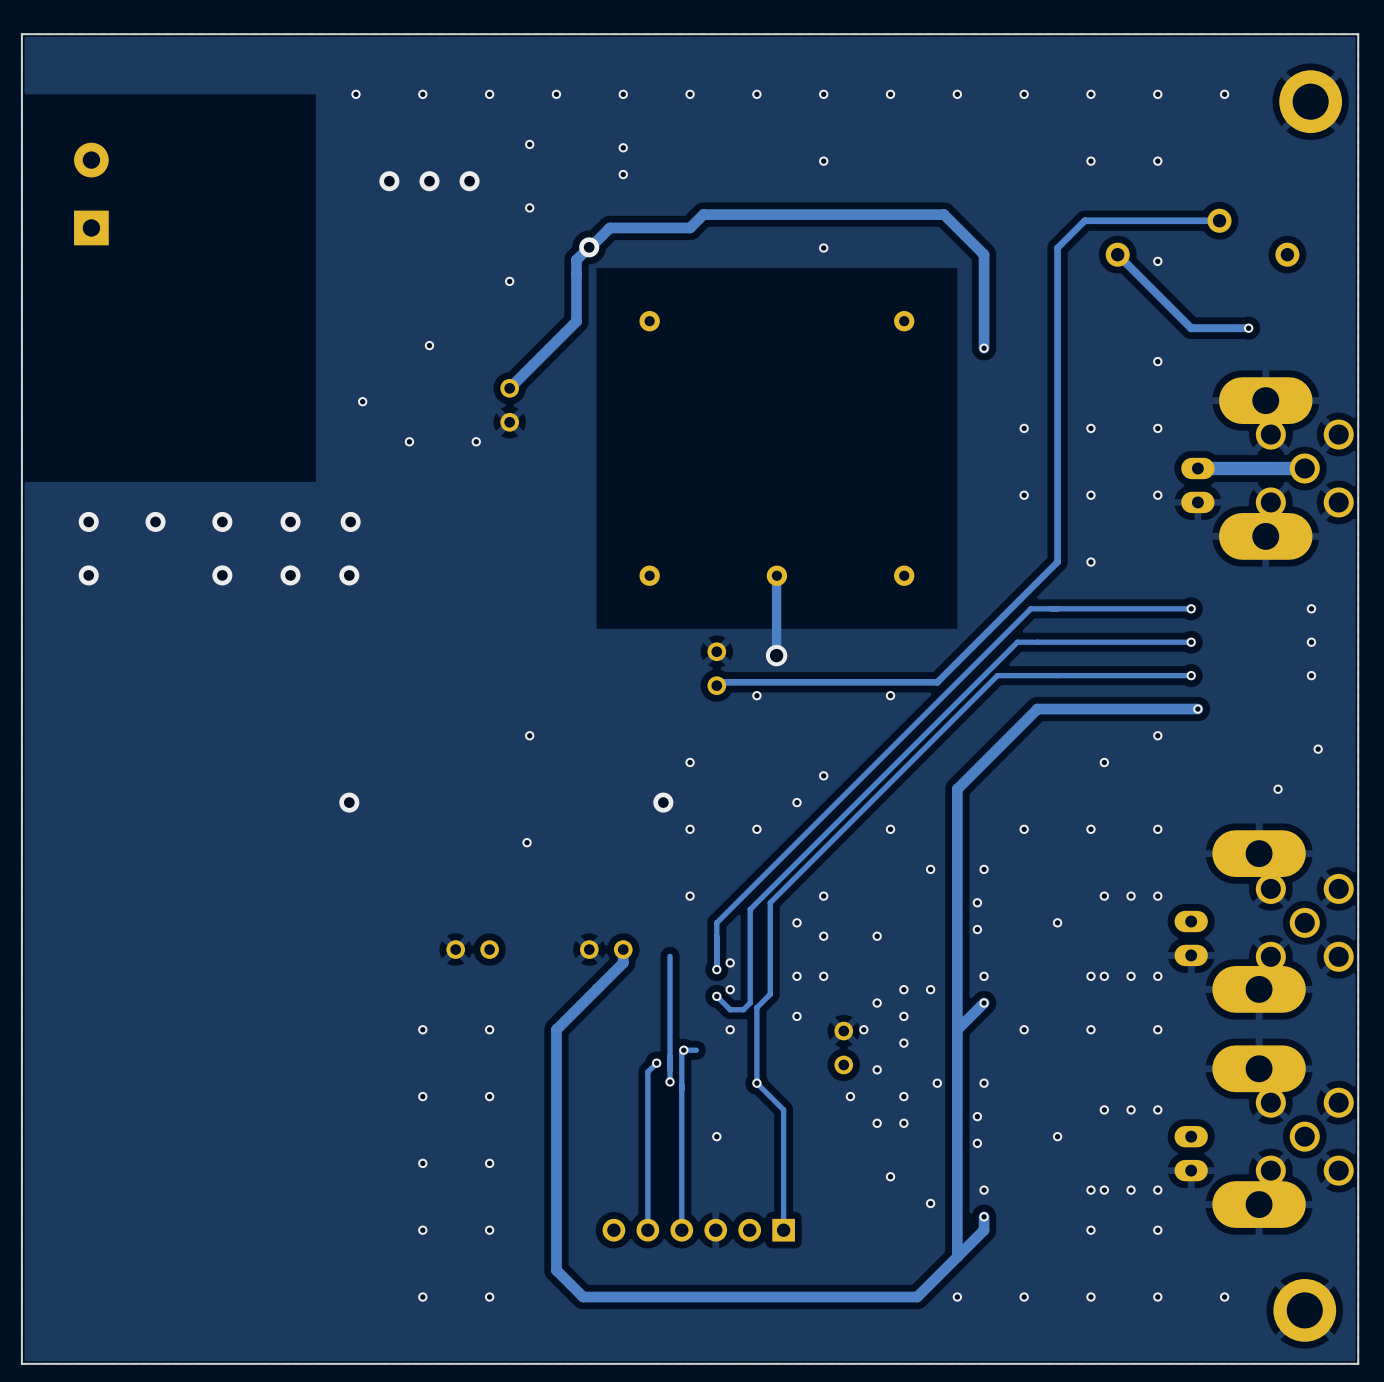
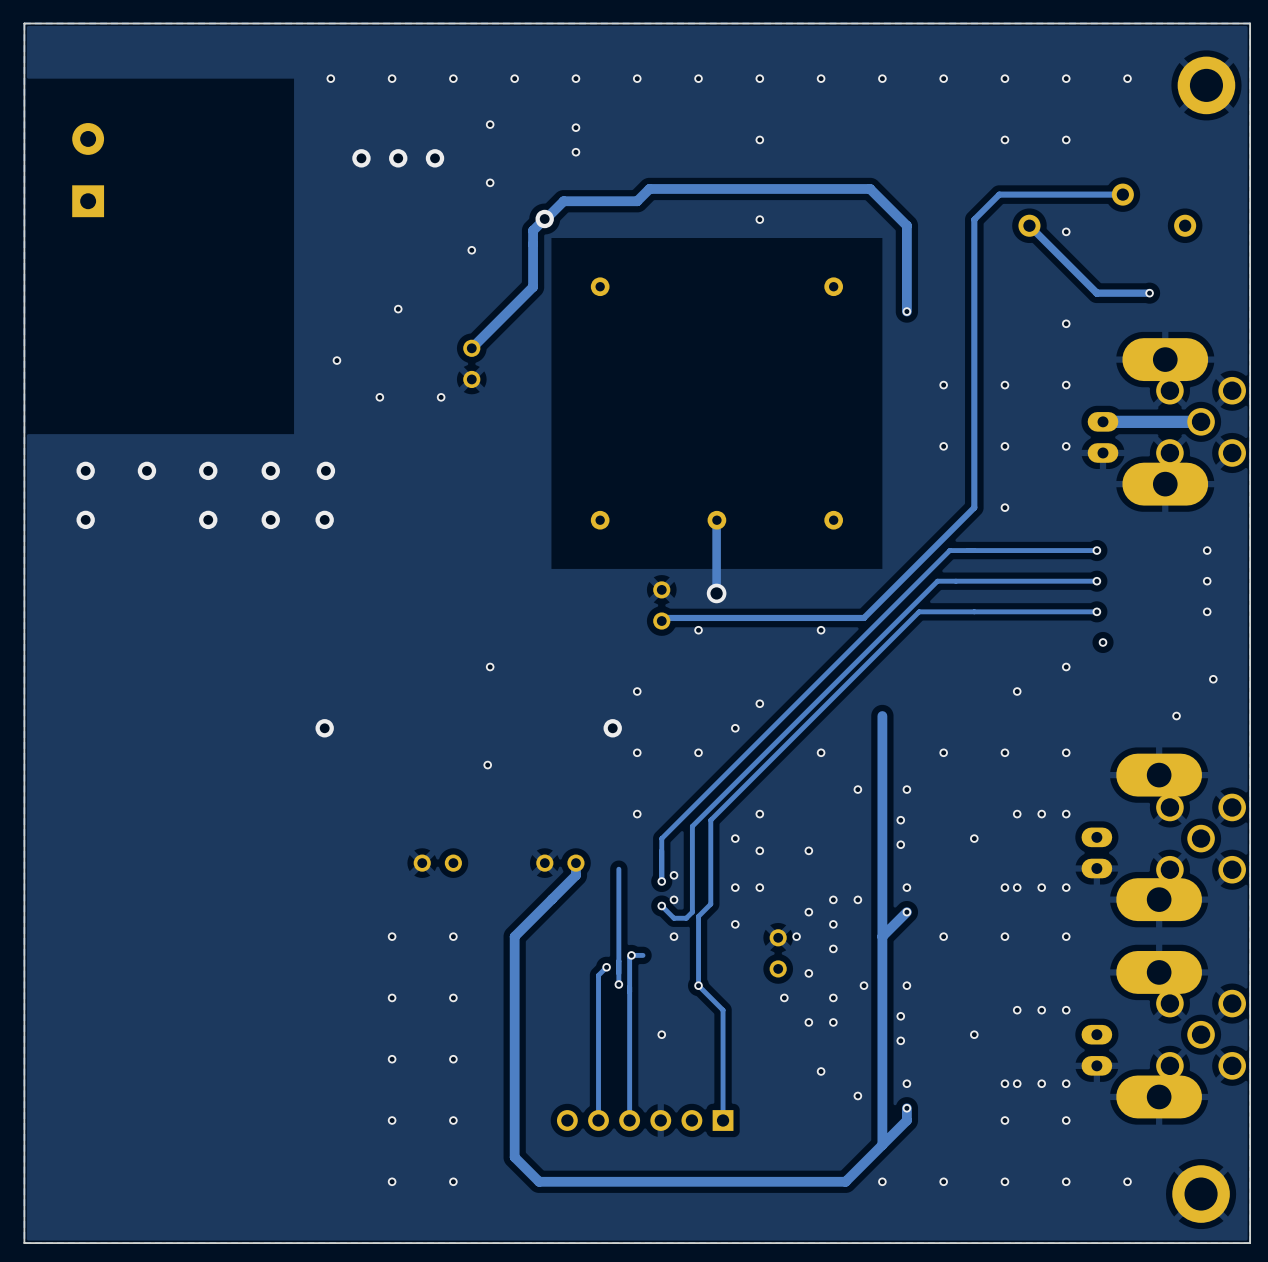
track: (1197, 709) (1037, 709) (957, 789) -> none

